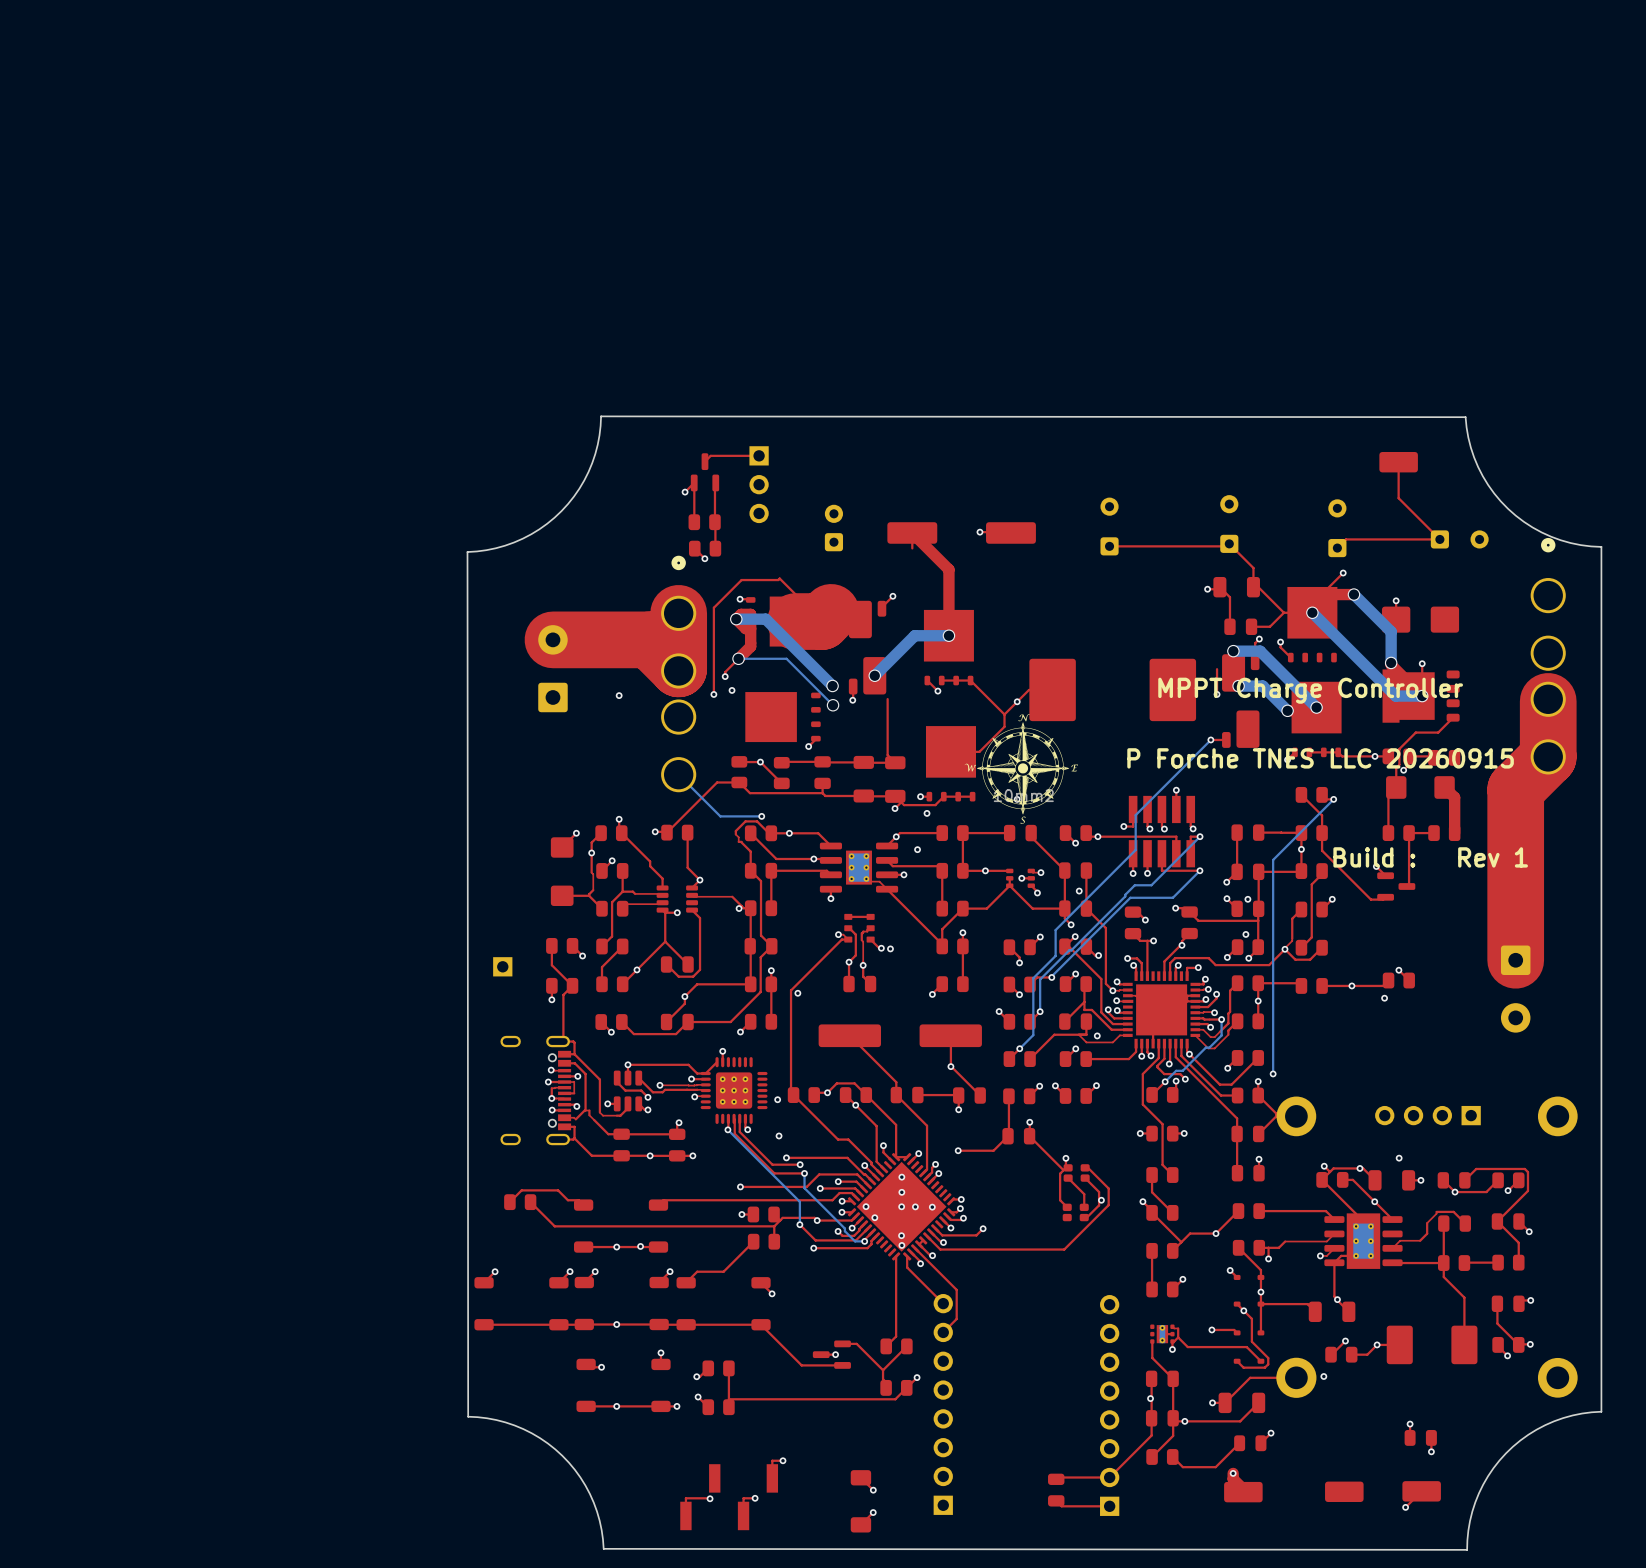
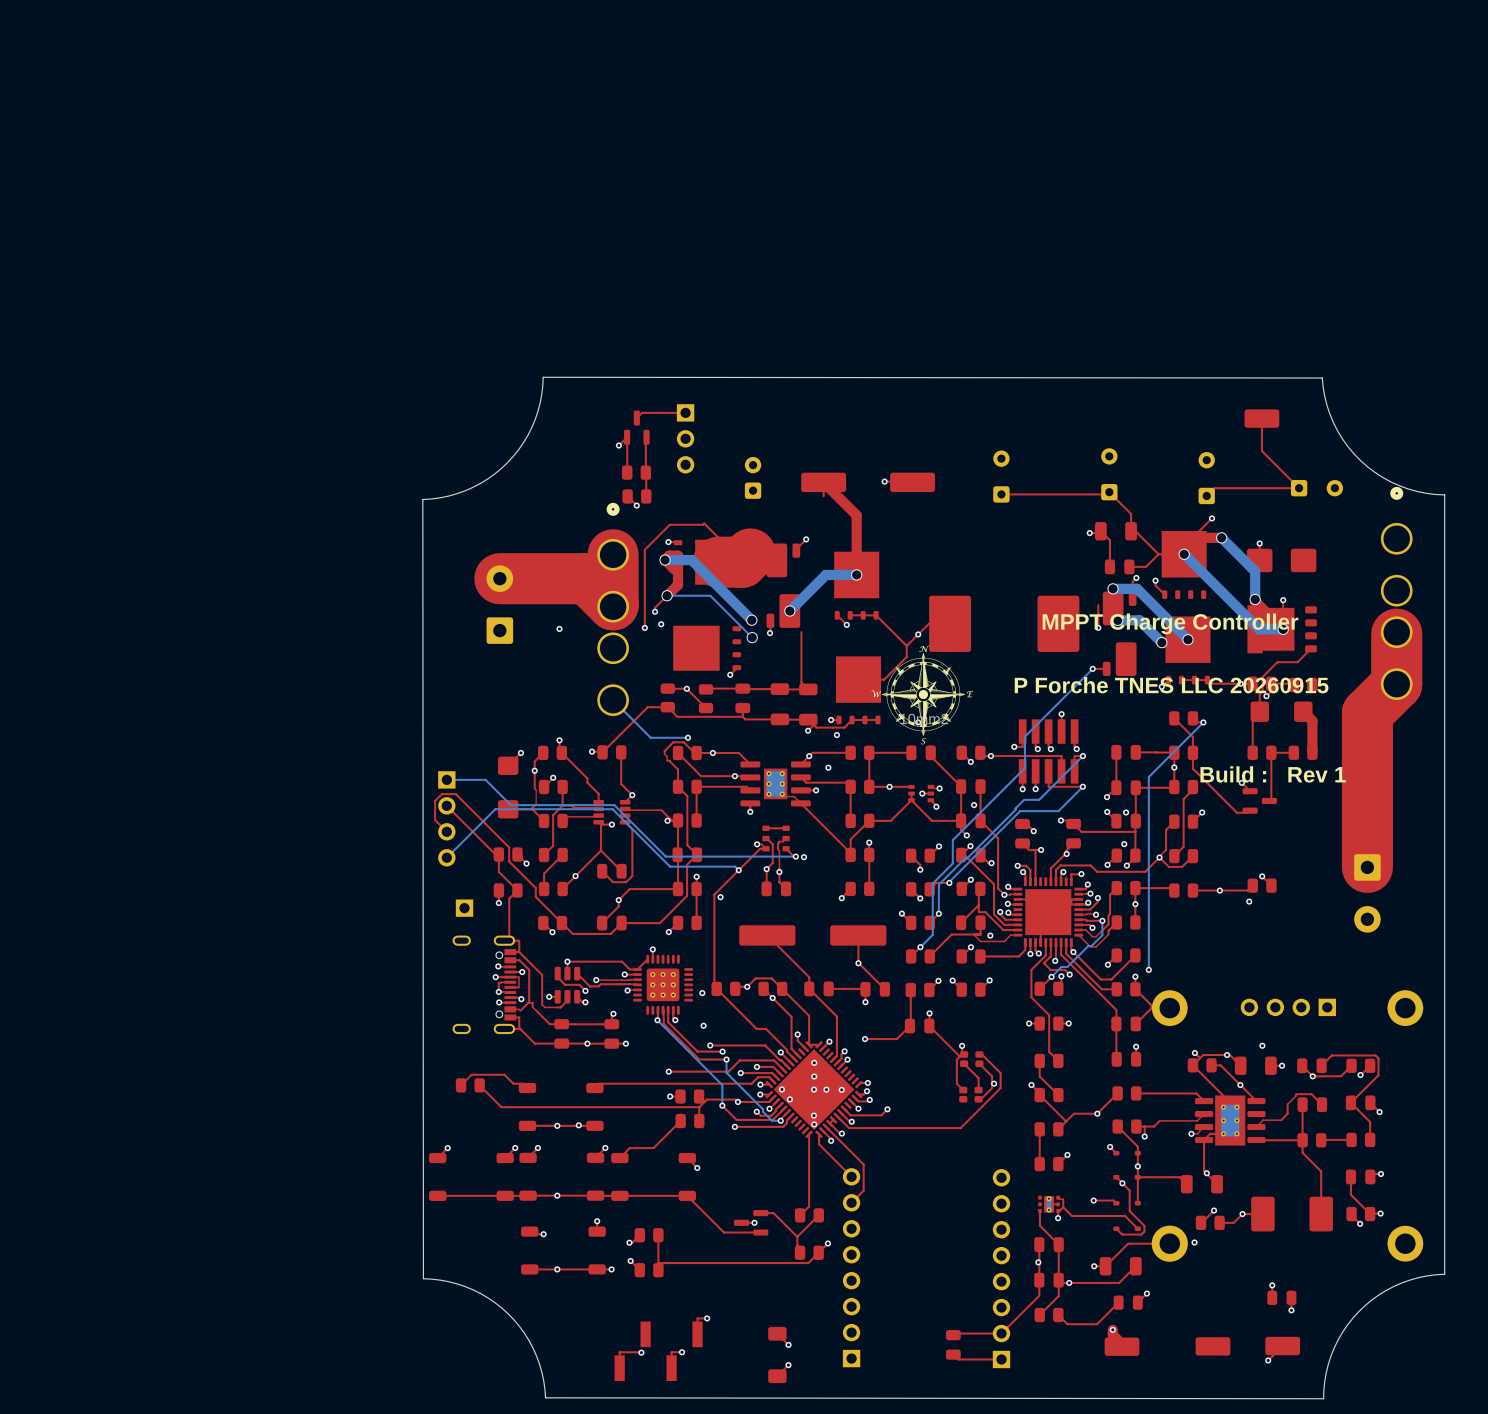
bottom track: none -> (446, 779) (485, 779) (510, 805) (614, 805) (665, 856) (795, 856)
top track: none -> (446, 805) (495, 854)
part: none -> (446, 818)
top track: none -> (446, 831) (435, 820) (435, 800) (441, 794) (455, 794) (509, 847) (509, 861) (535, 888) (535, 896) (561, 923)
bottom track: none -> (446, 857) (495, 809) (612, 809) (670, 866) (735, 866) (738, 870)
via: none -> (738, 870)
part position: (502, 966) -> (464, 908)

